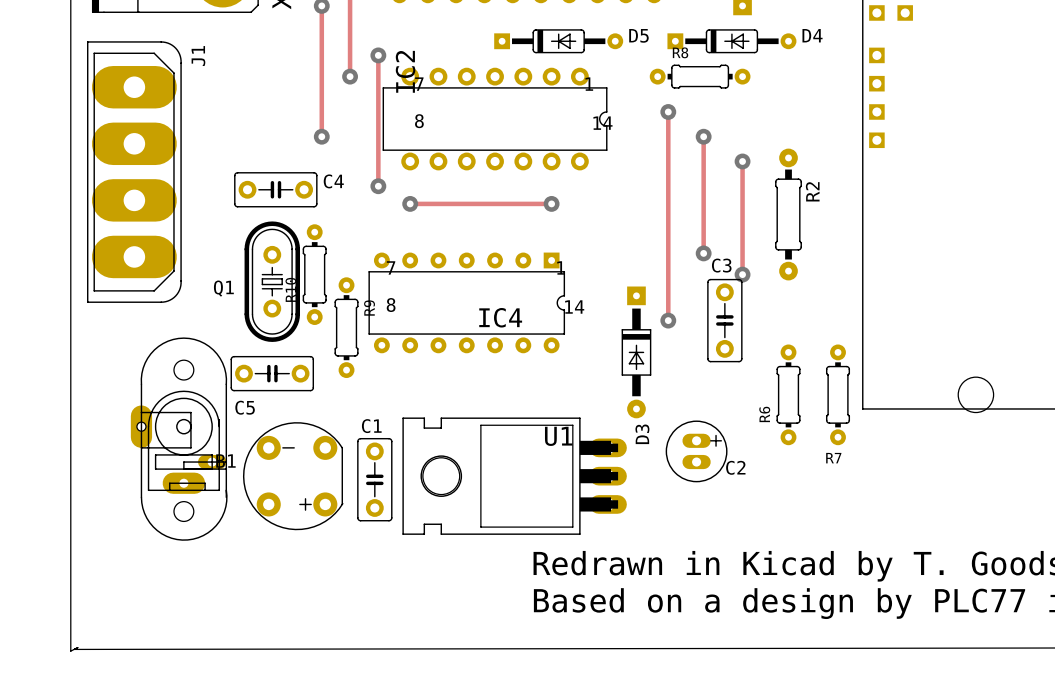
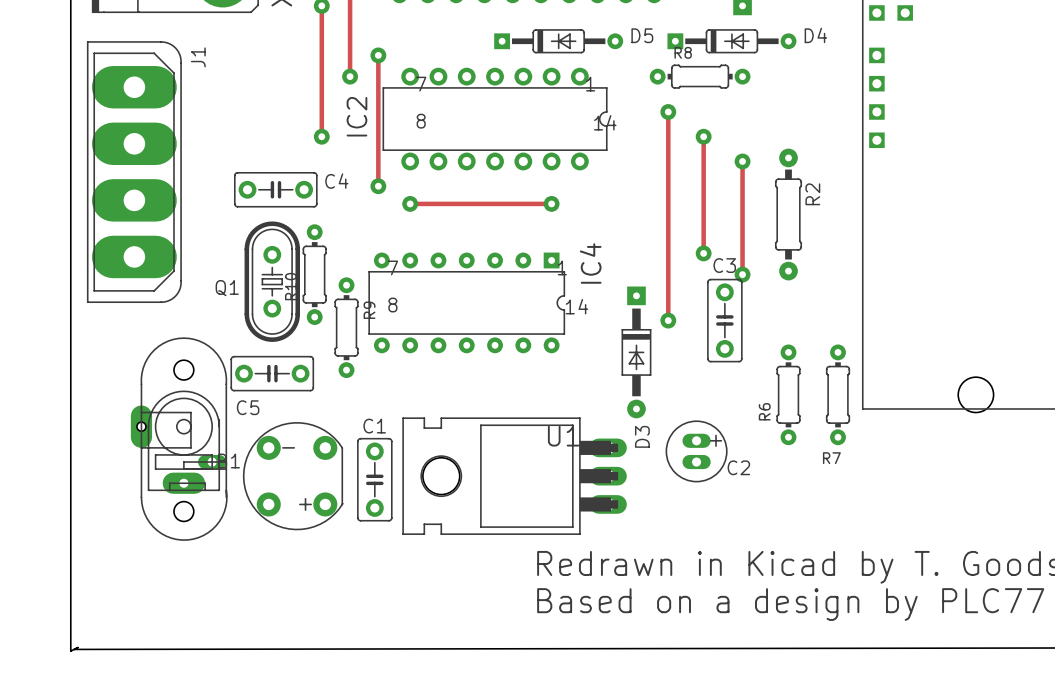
IC2 name position: IC2 (405, 71) -> IC2 (356, 116)
IC4 name rotation: 0° (500, 317) -> 90° counterclockwise (590, 263)
IC4 name position: IC4 (500, 317) -> IC4 (590, 263)

